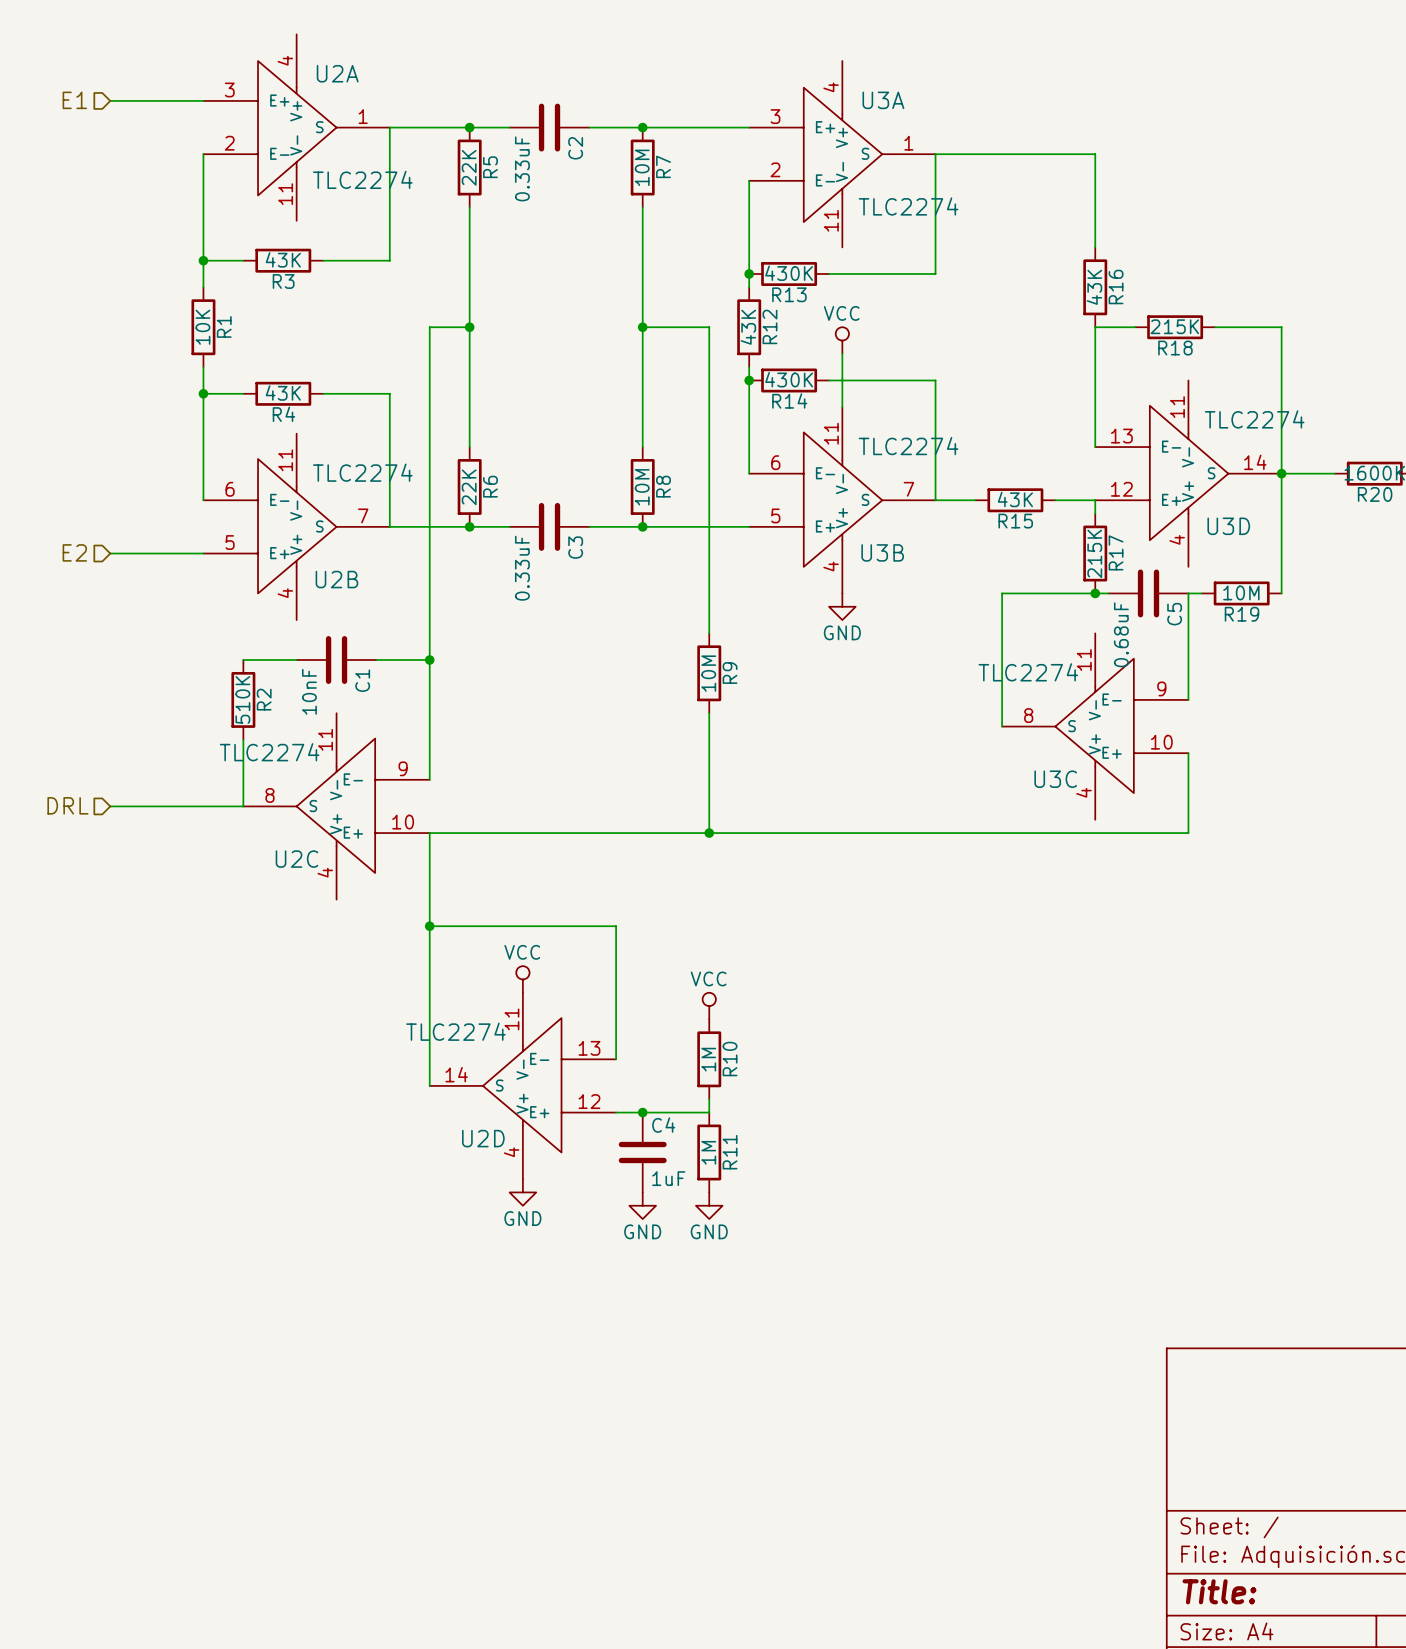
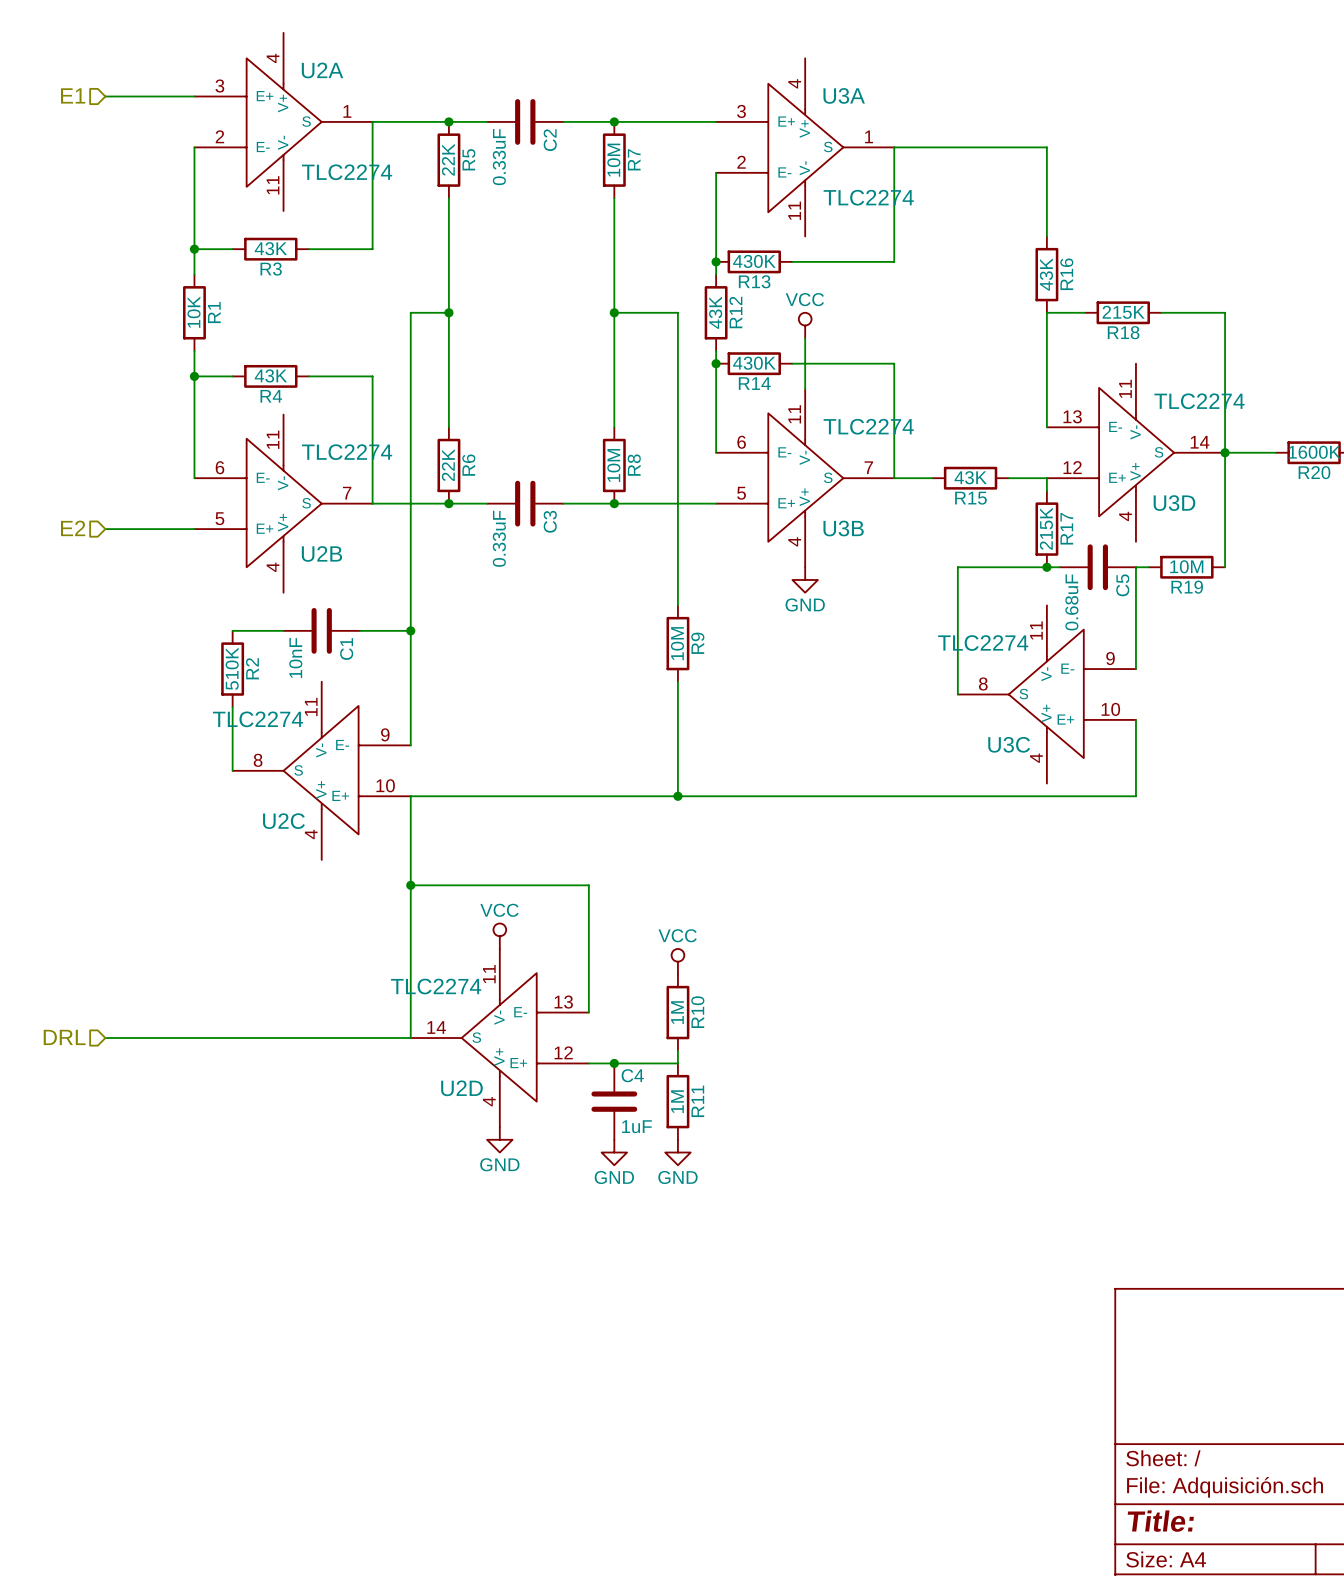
hierarchical label: DRL (67, 805) -> none
wire: (110, 806) (243, 806) -> none
hierarchical label: none -> DRL (64, 1037)
wire: none -> (105, 1038) (410, 1038)

